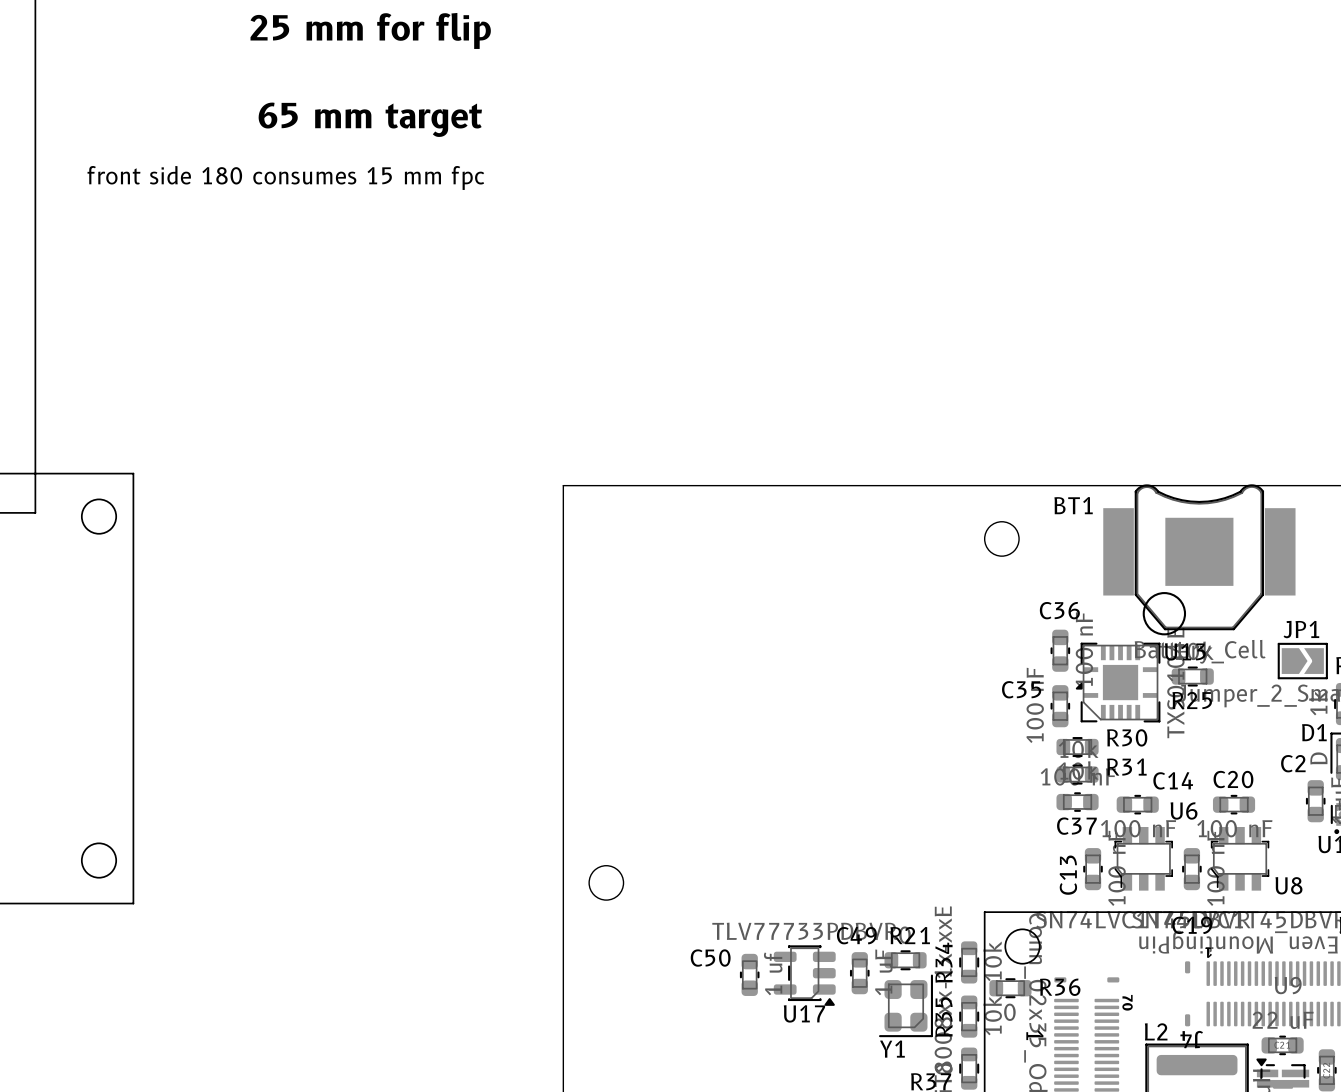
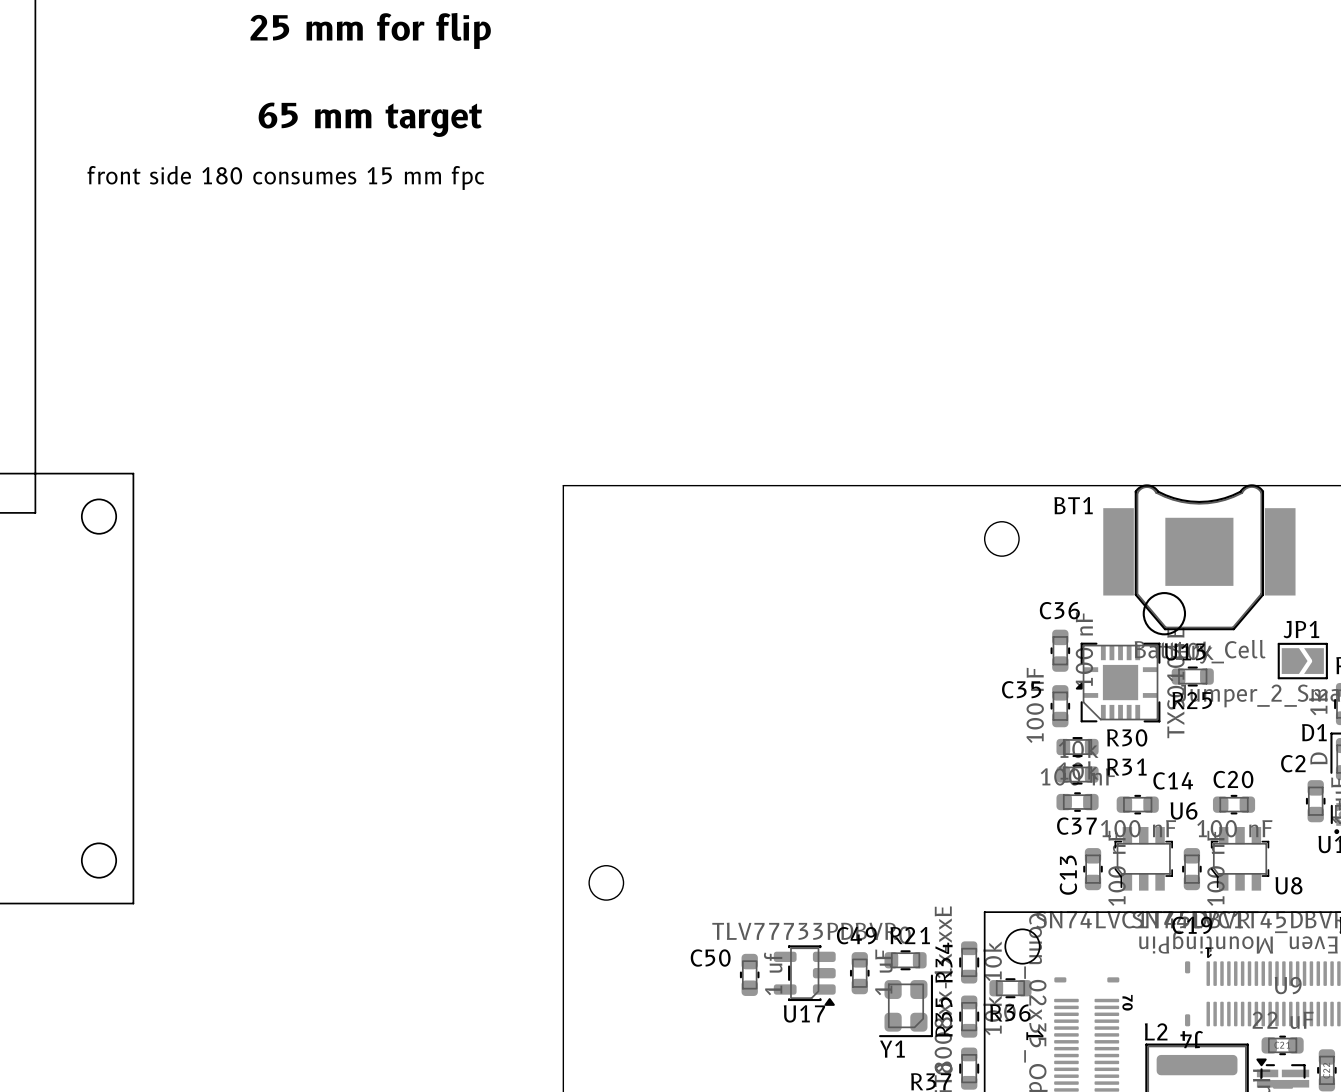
R36 name position: R36 (1060, 987) -> R36 (1010, 1013)

